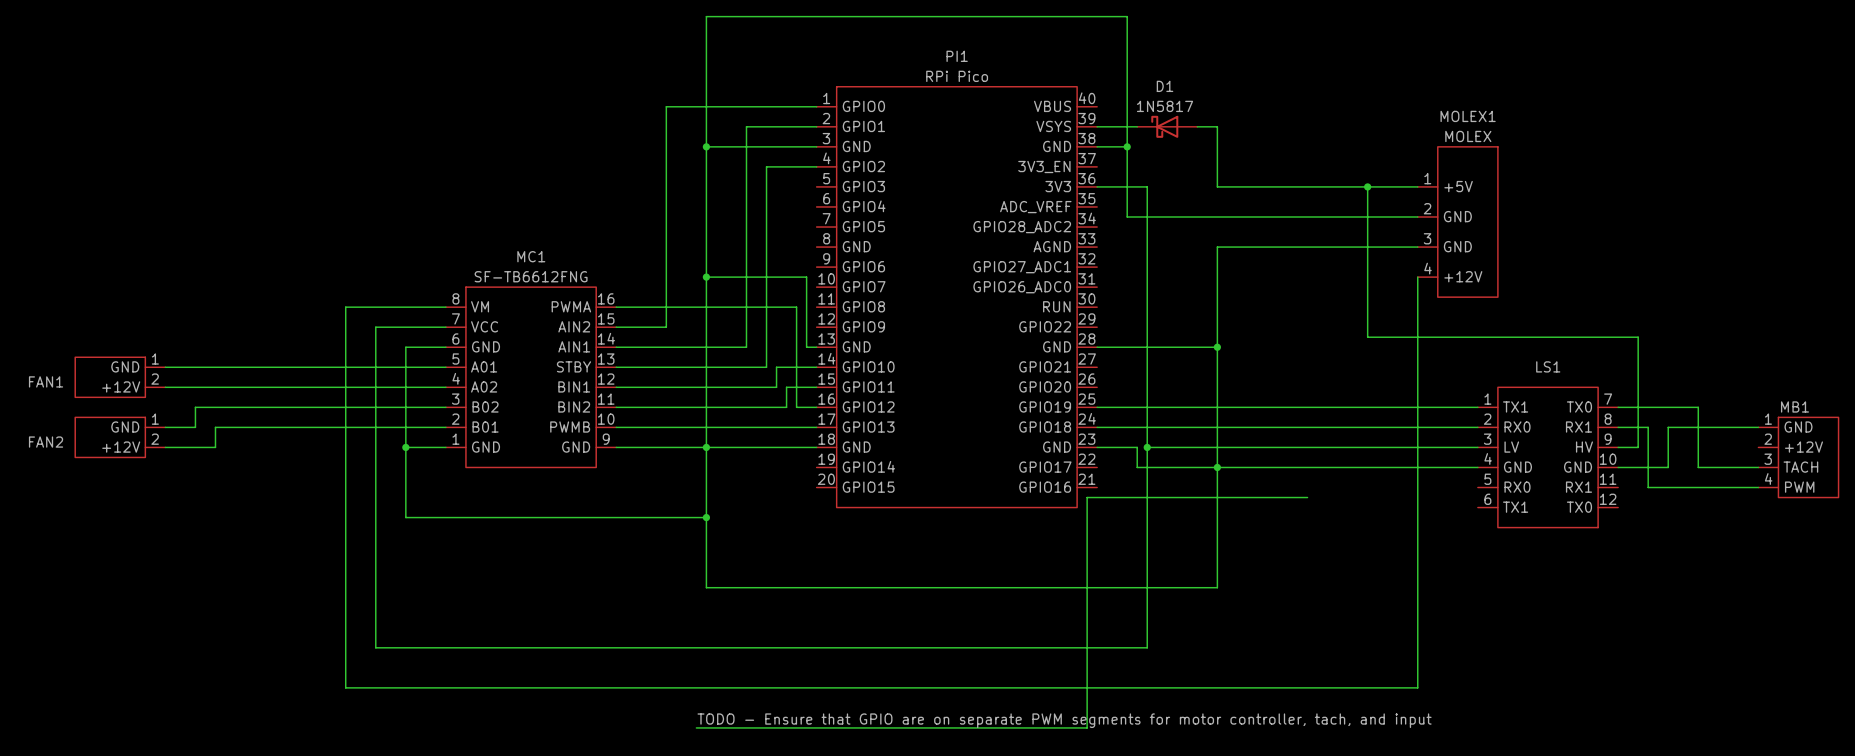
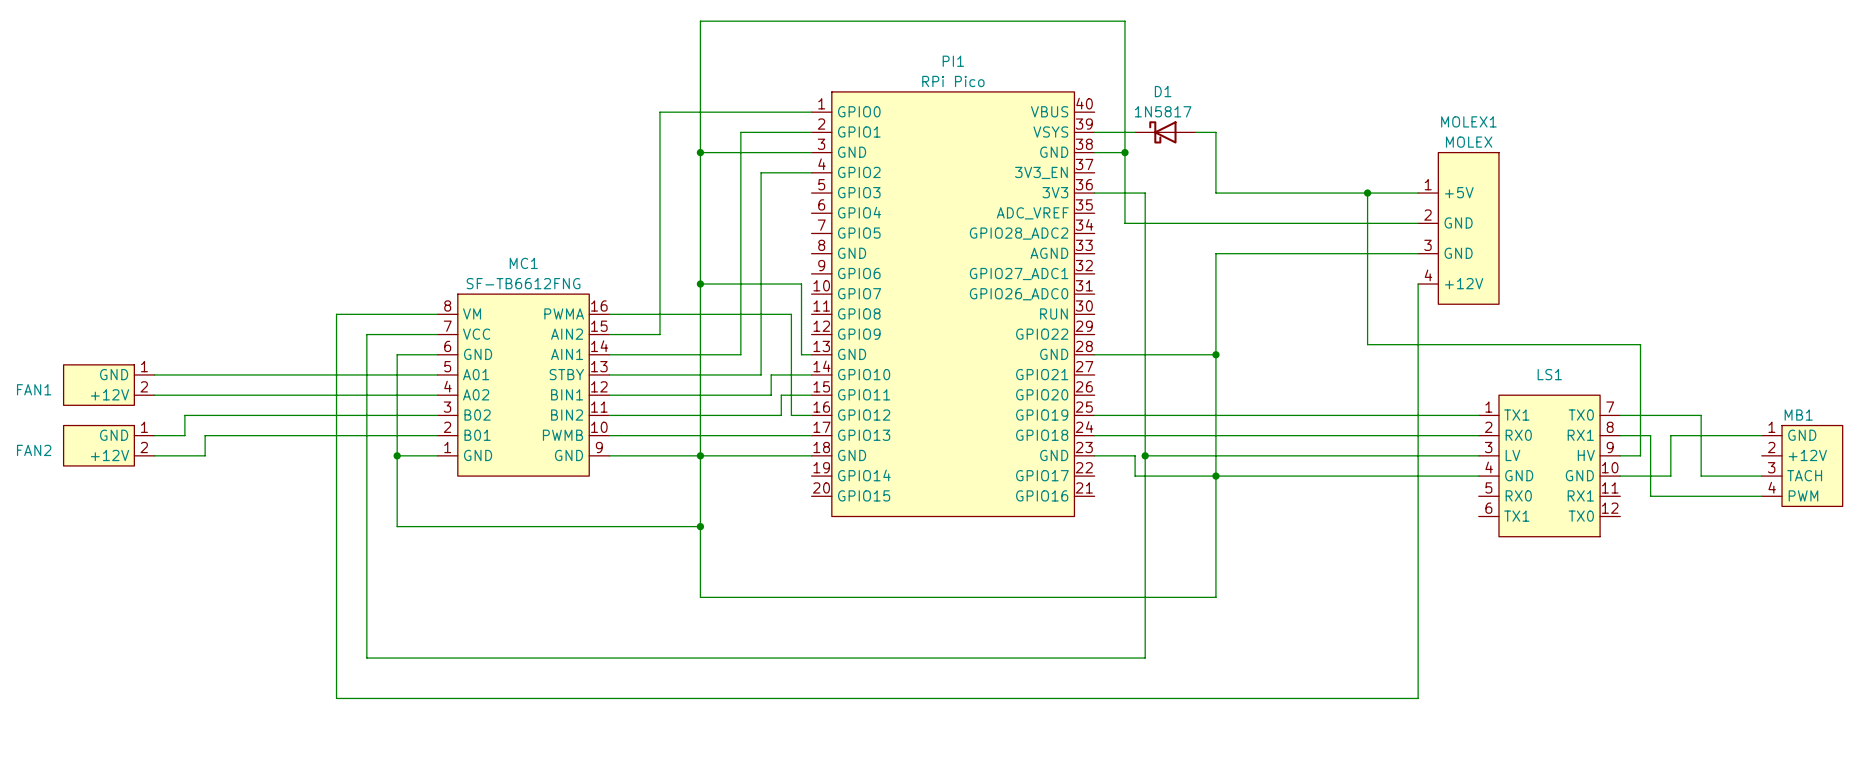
wire: (1307, 497) (1087, 497) (1087, 727) (696, 727) -> none
label: TODO - Ensure that GPIO are on separate PWM segments for motor controller, tach, and input (1064, 720) -> none

